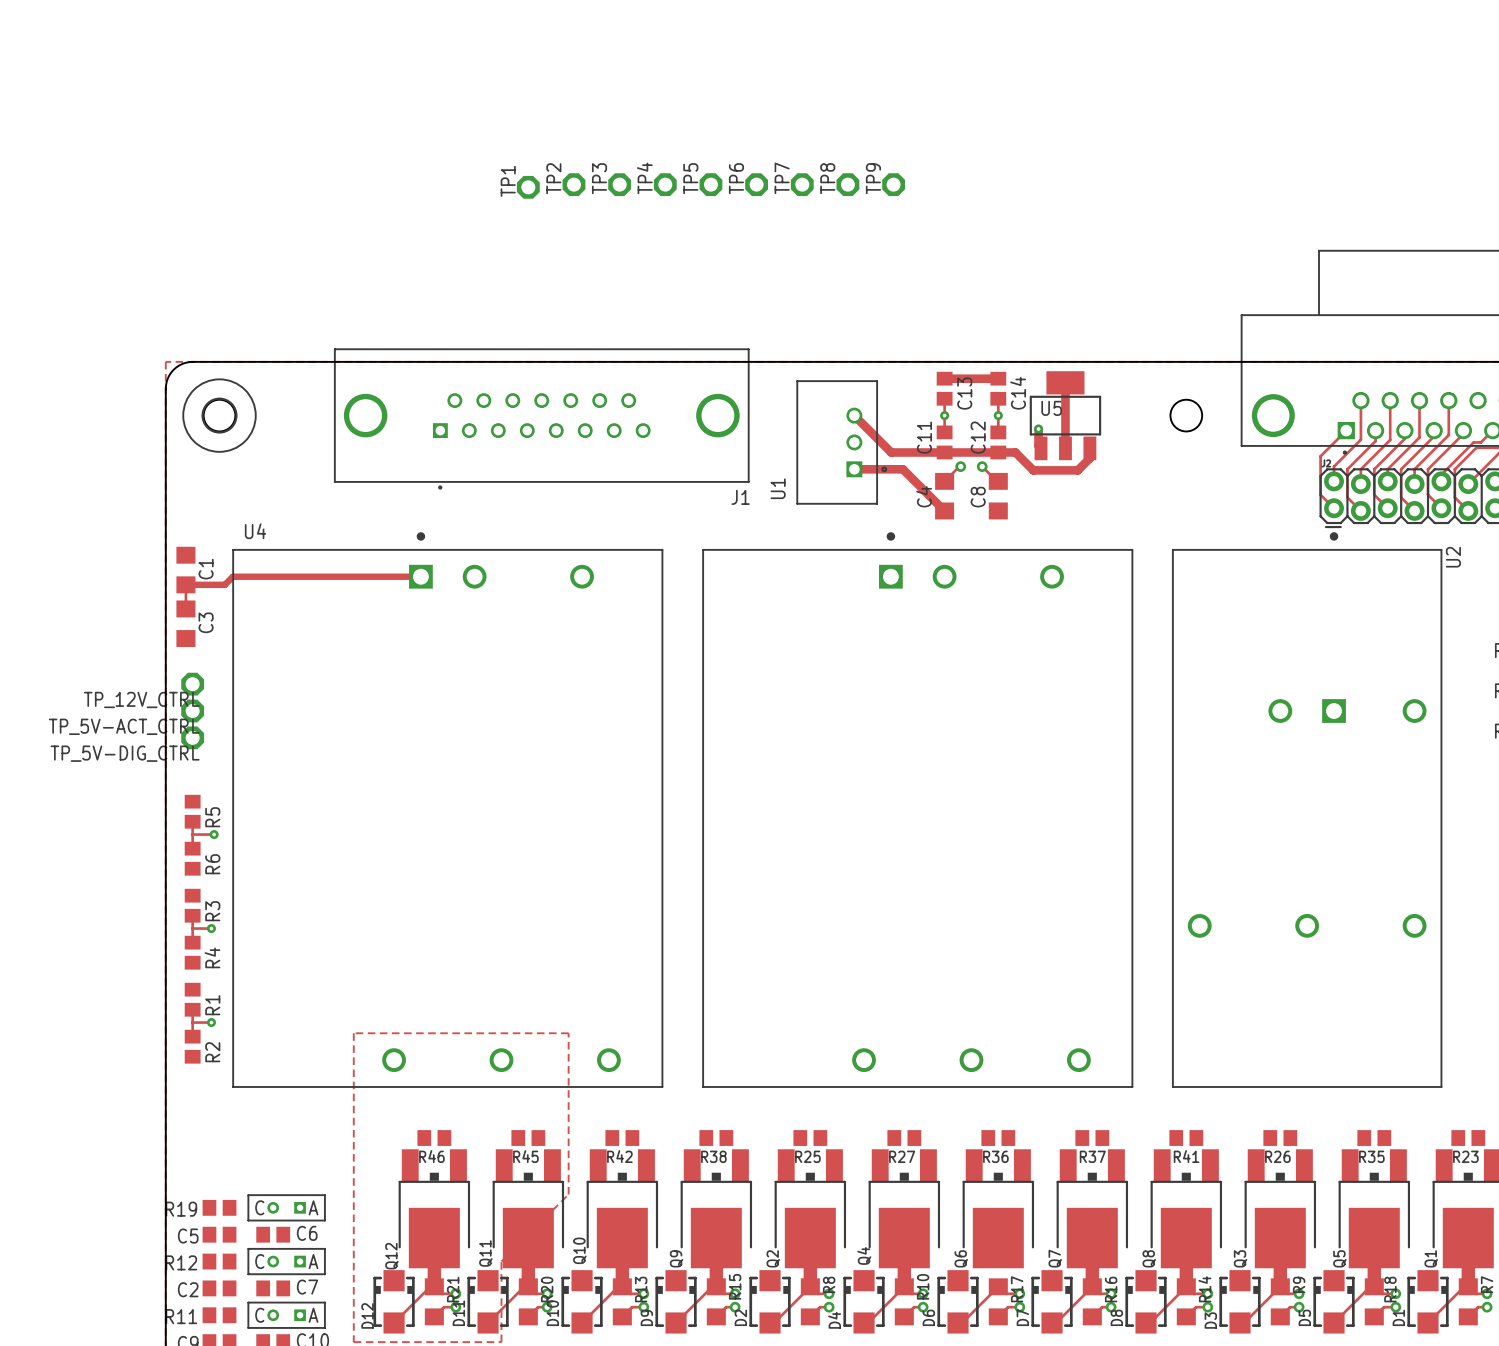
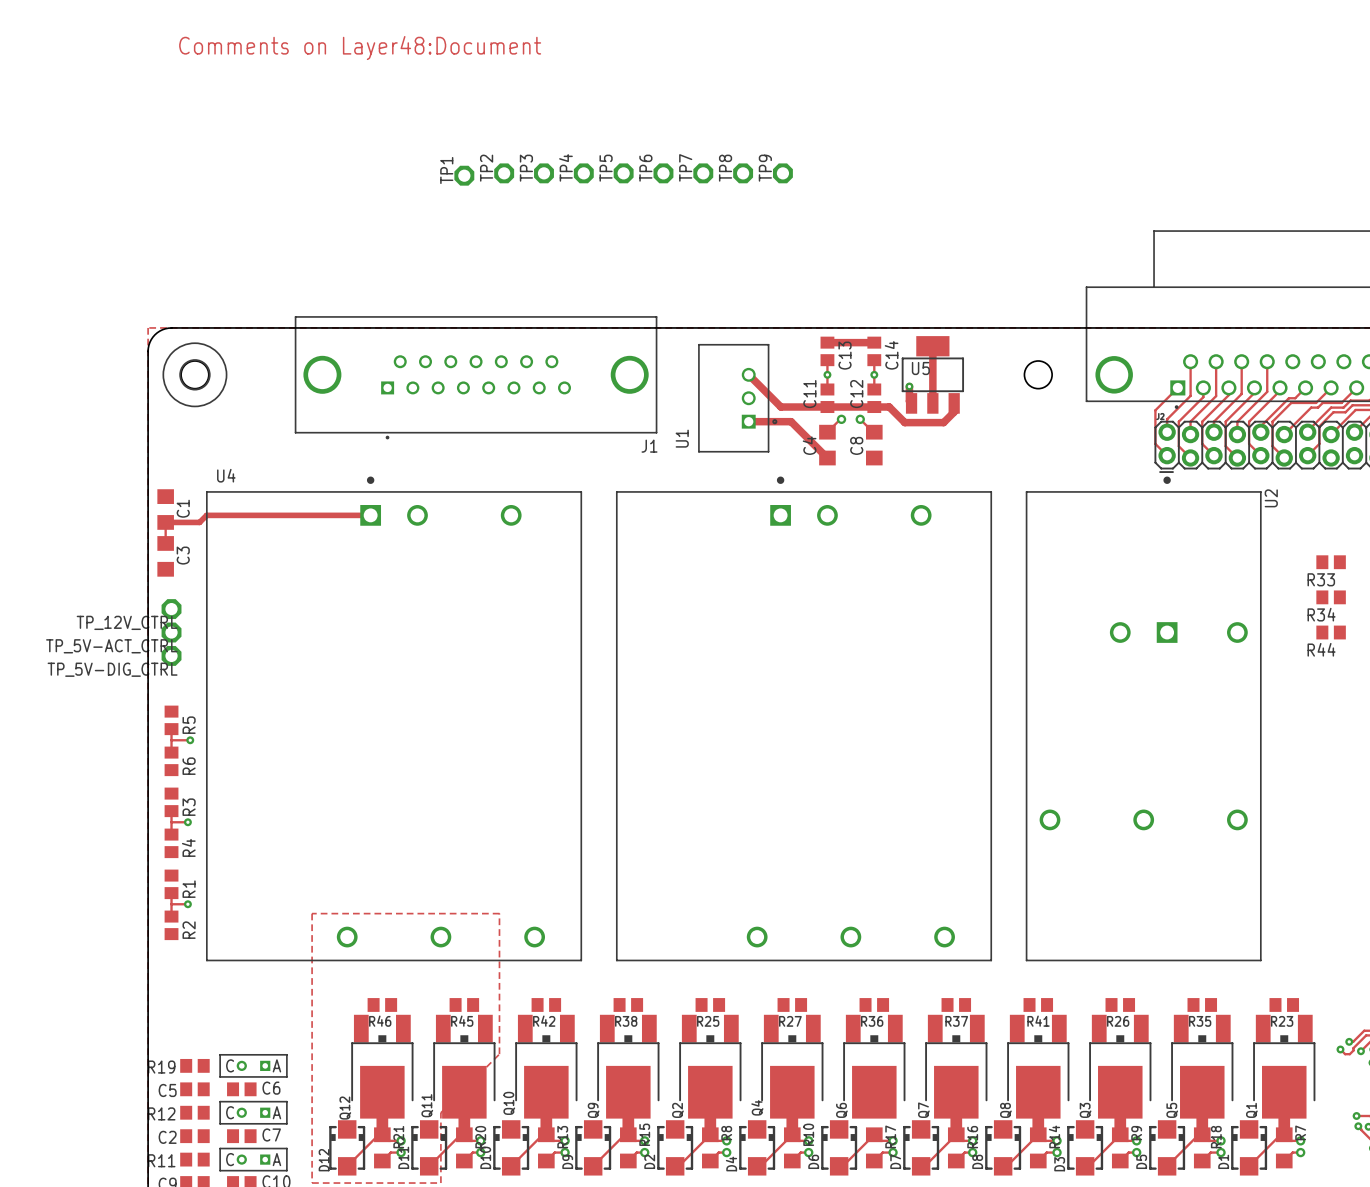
text: none -> Comments on Layer48:Document (360, 48)

